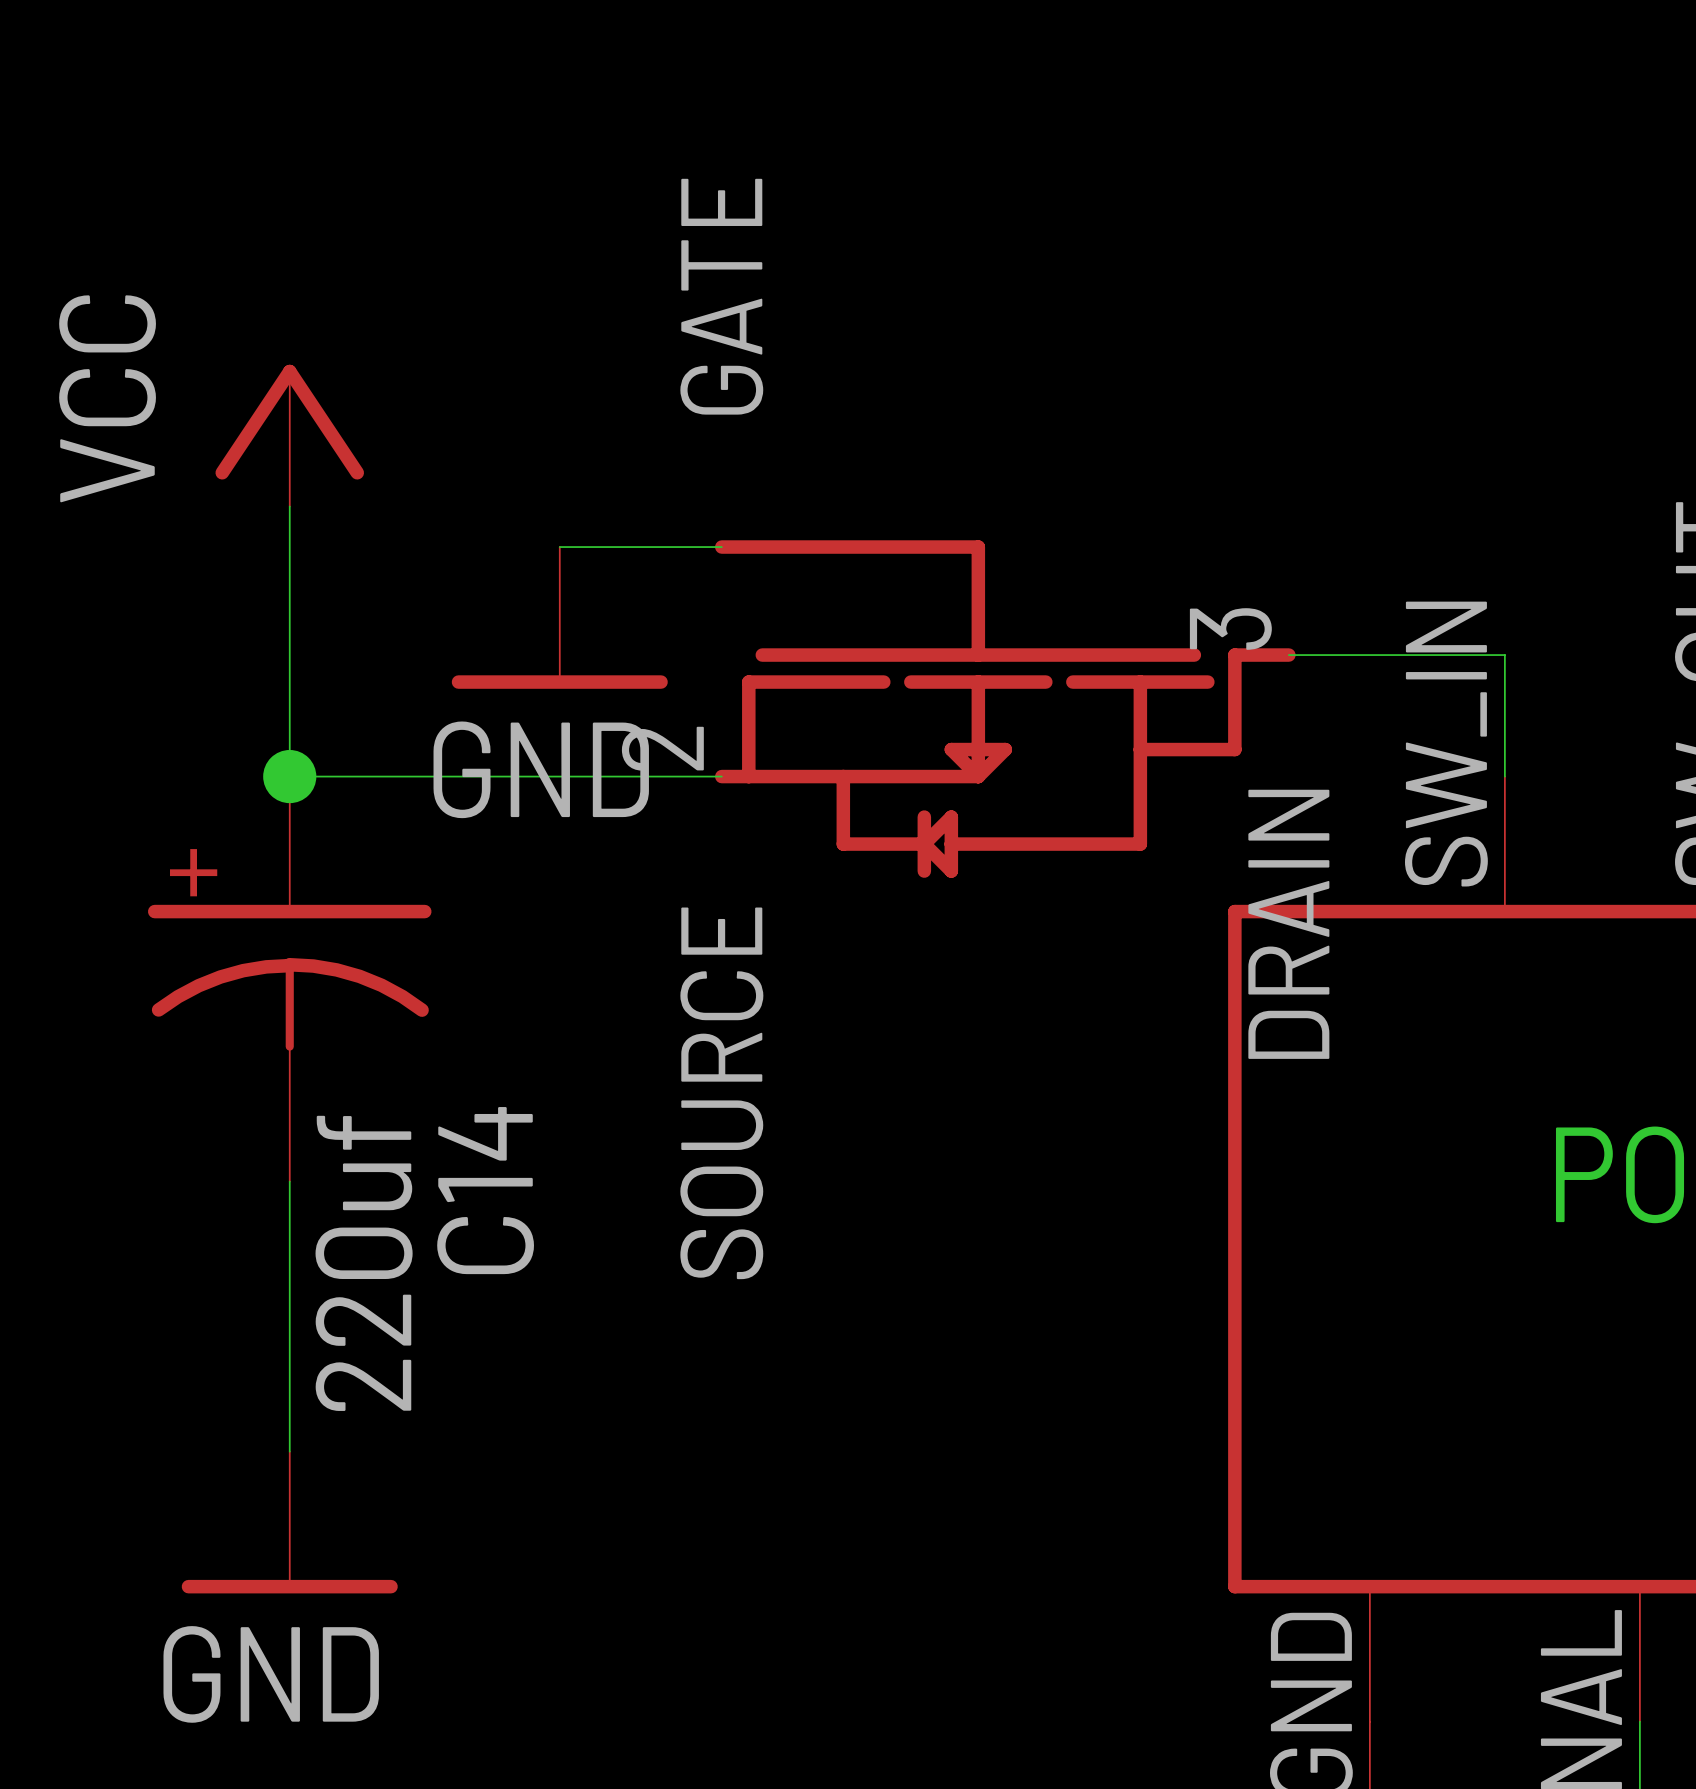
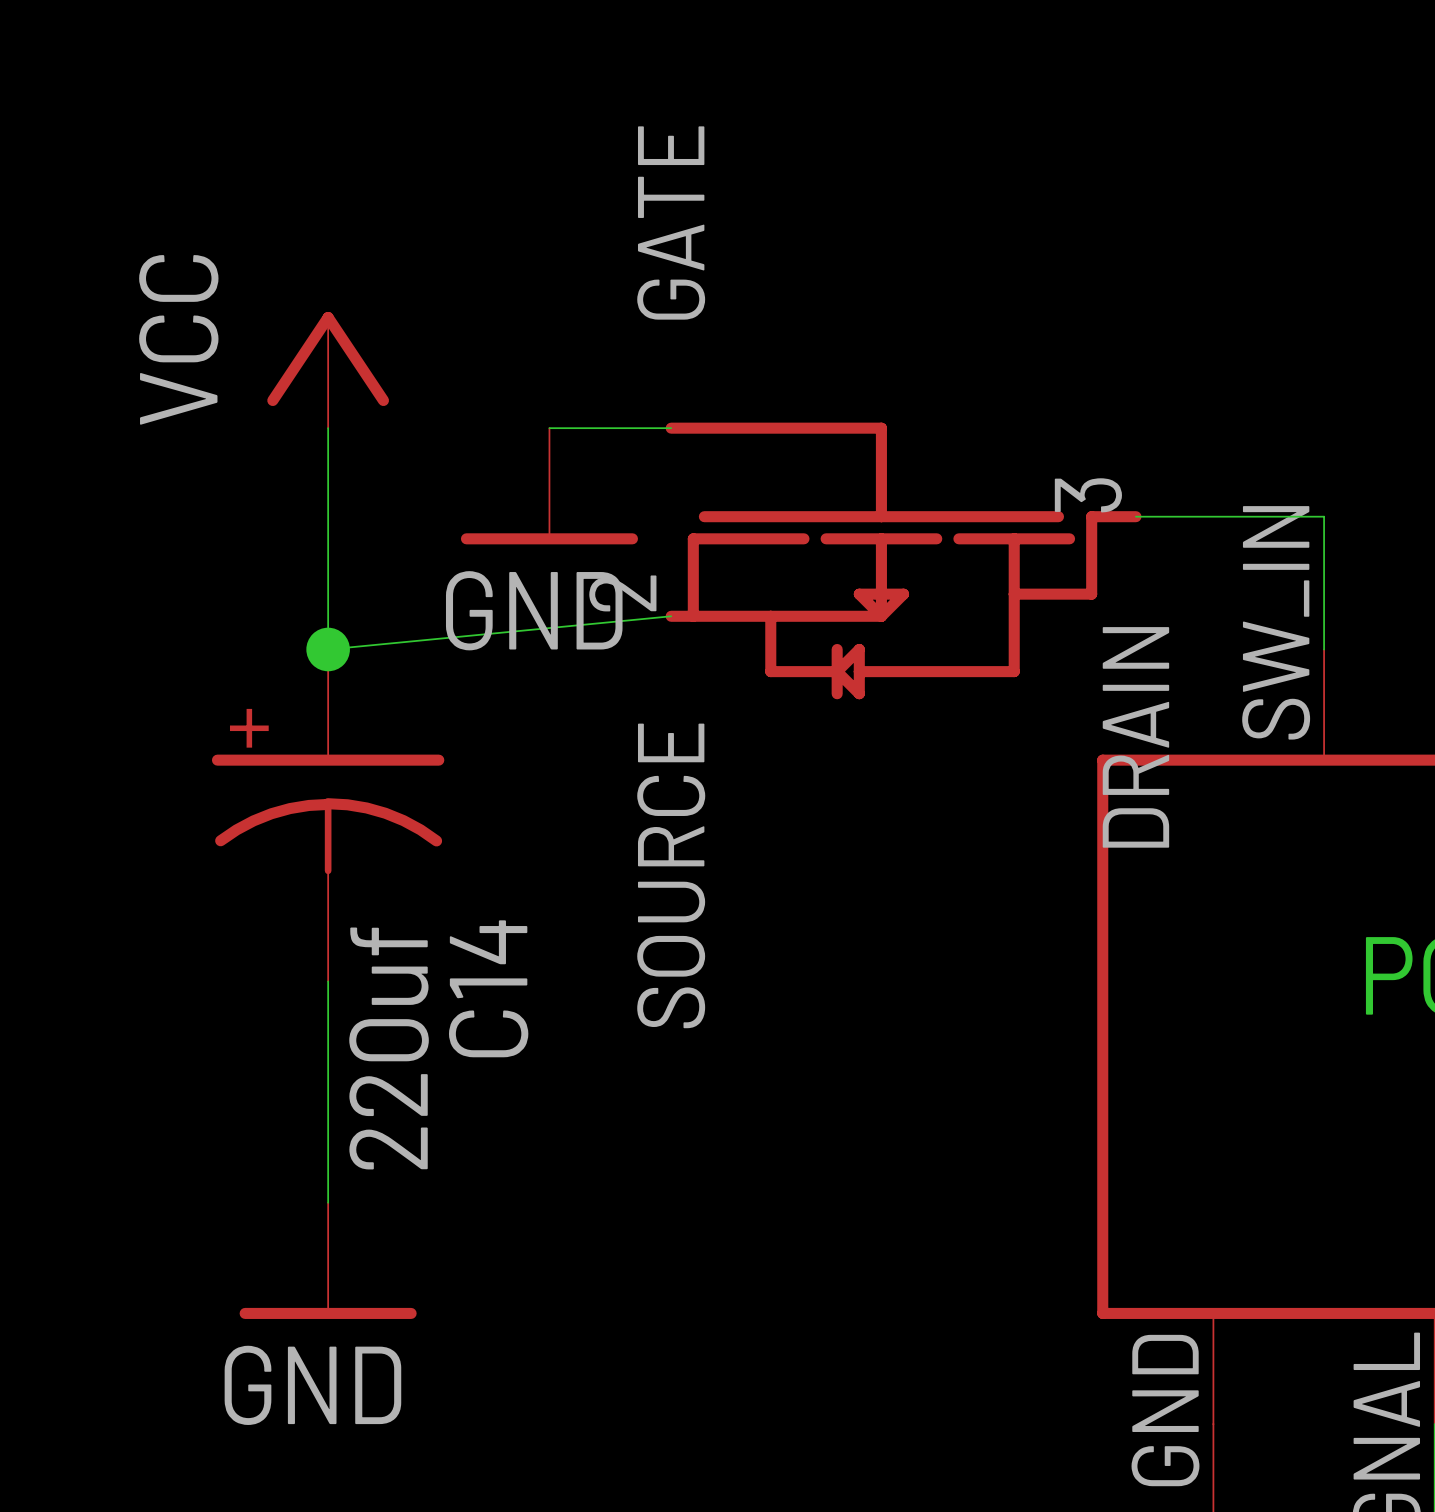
wire: none -> (549, 428) (671, 428)
wire: (559, 547) (721, 547) -> none
power symbol position: GND (559, 617) -> GND (549, 486)
wire: (1288, 655) (1504, 655) -> (1135, 516) (1324, 516) (1324, 549)
part position: (1005, 709) -> (903, 560)
wire: (289, 776) (721, 776) -> (328, 649) (671, 616)

